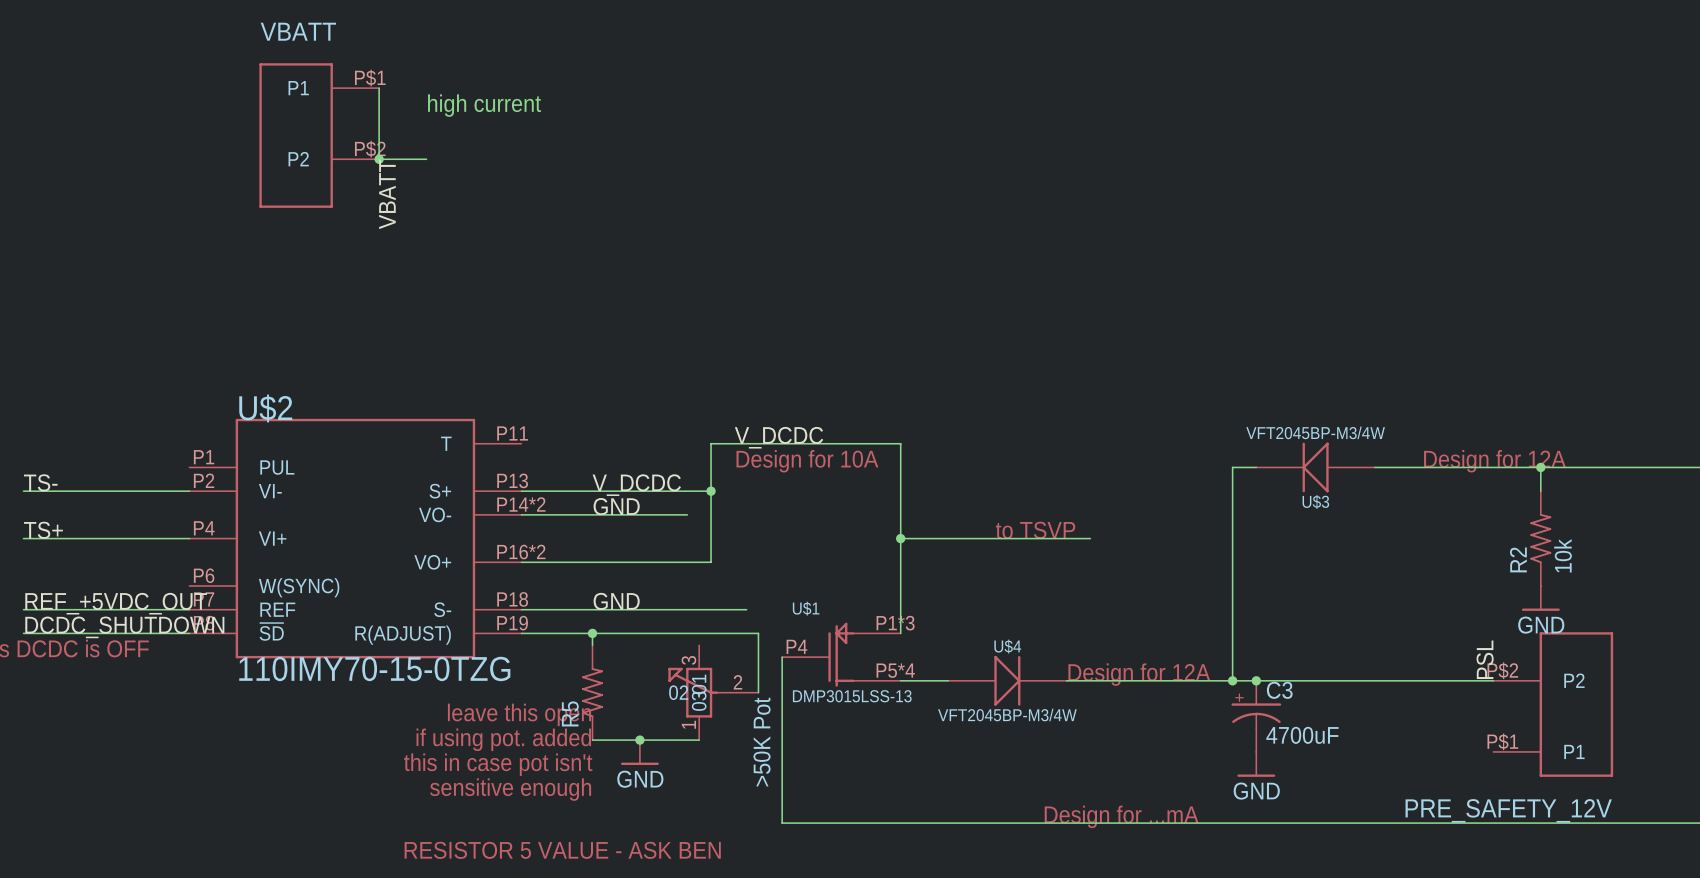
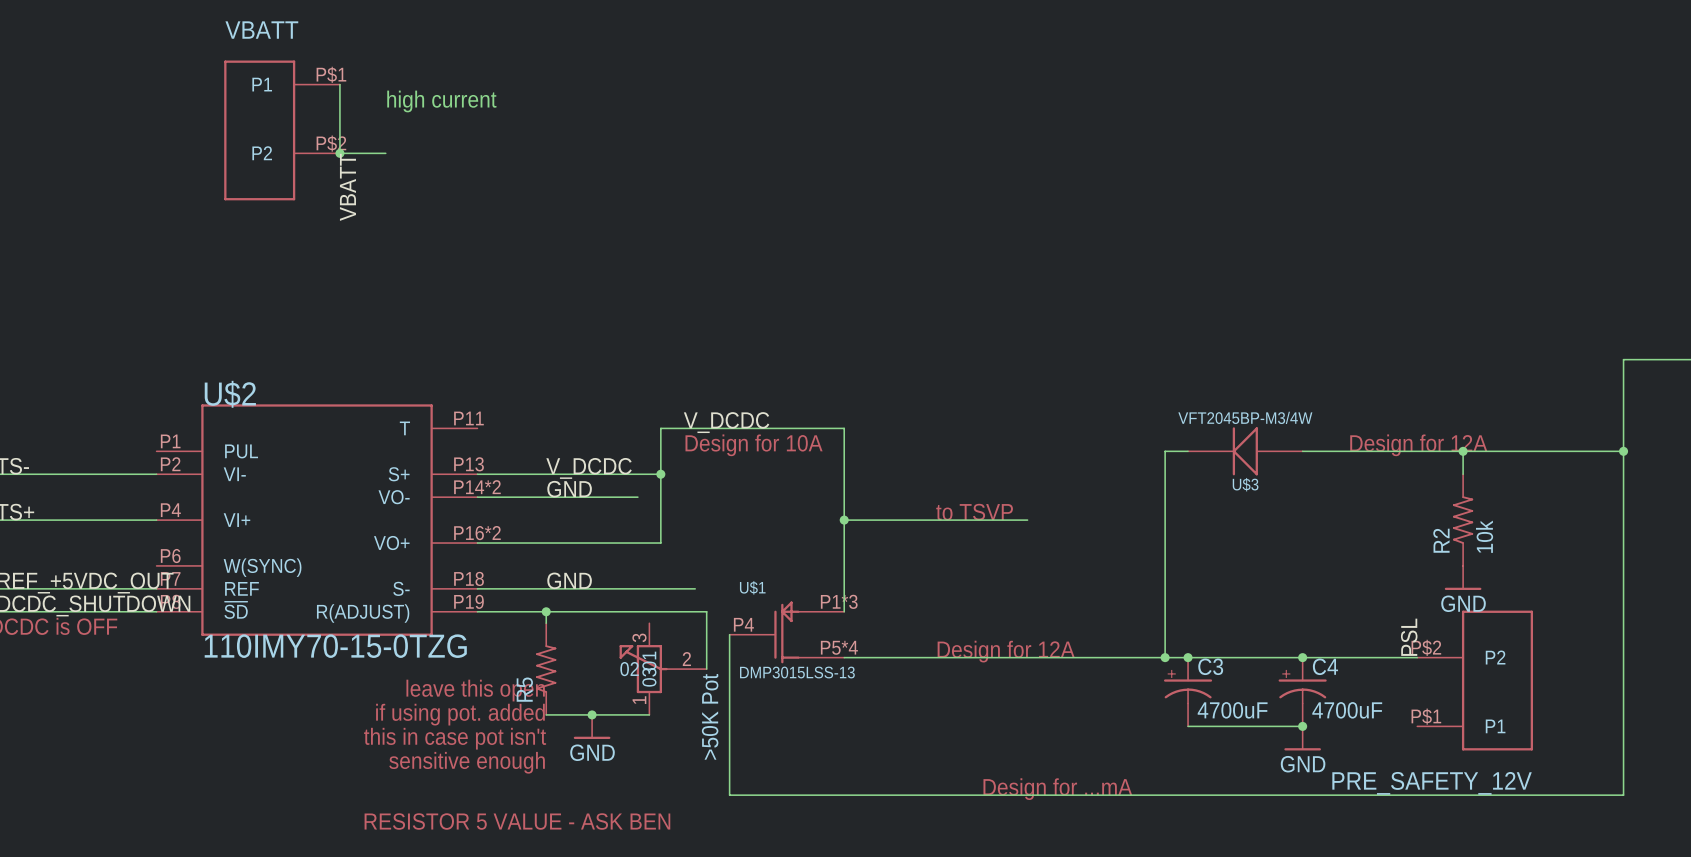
text position: Design for 12A (1139, 674) -> Design for 12A (1006, 651)
U$4: VFT2045BP-M3/4W (1007, 680) -> none
junction: none -> (1302, 657)
C4: none -> 4700uF (1302, 692)
wire: none -> (1188, 726) (1302, 726)
junction: none -> (1302, 726)
power symbol position: GND (1256, 764) -> GND (1302, 738)

